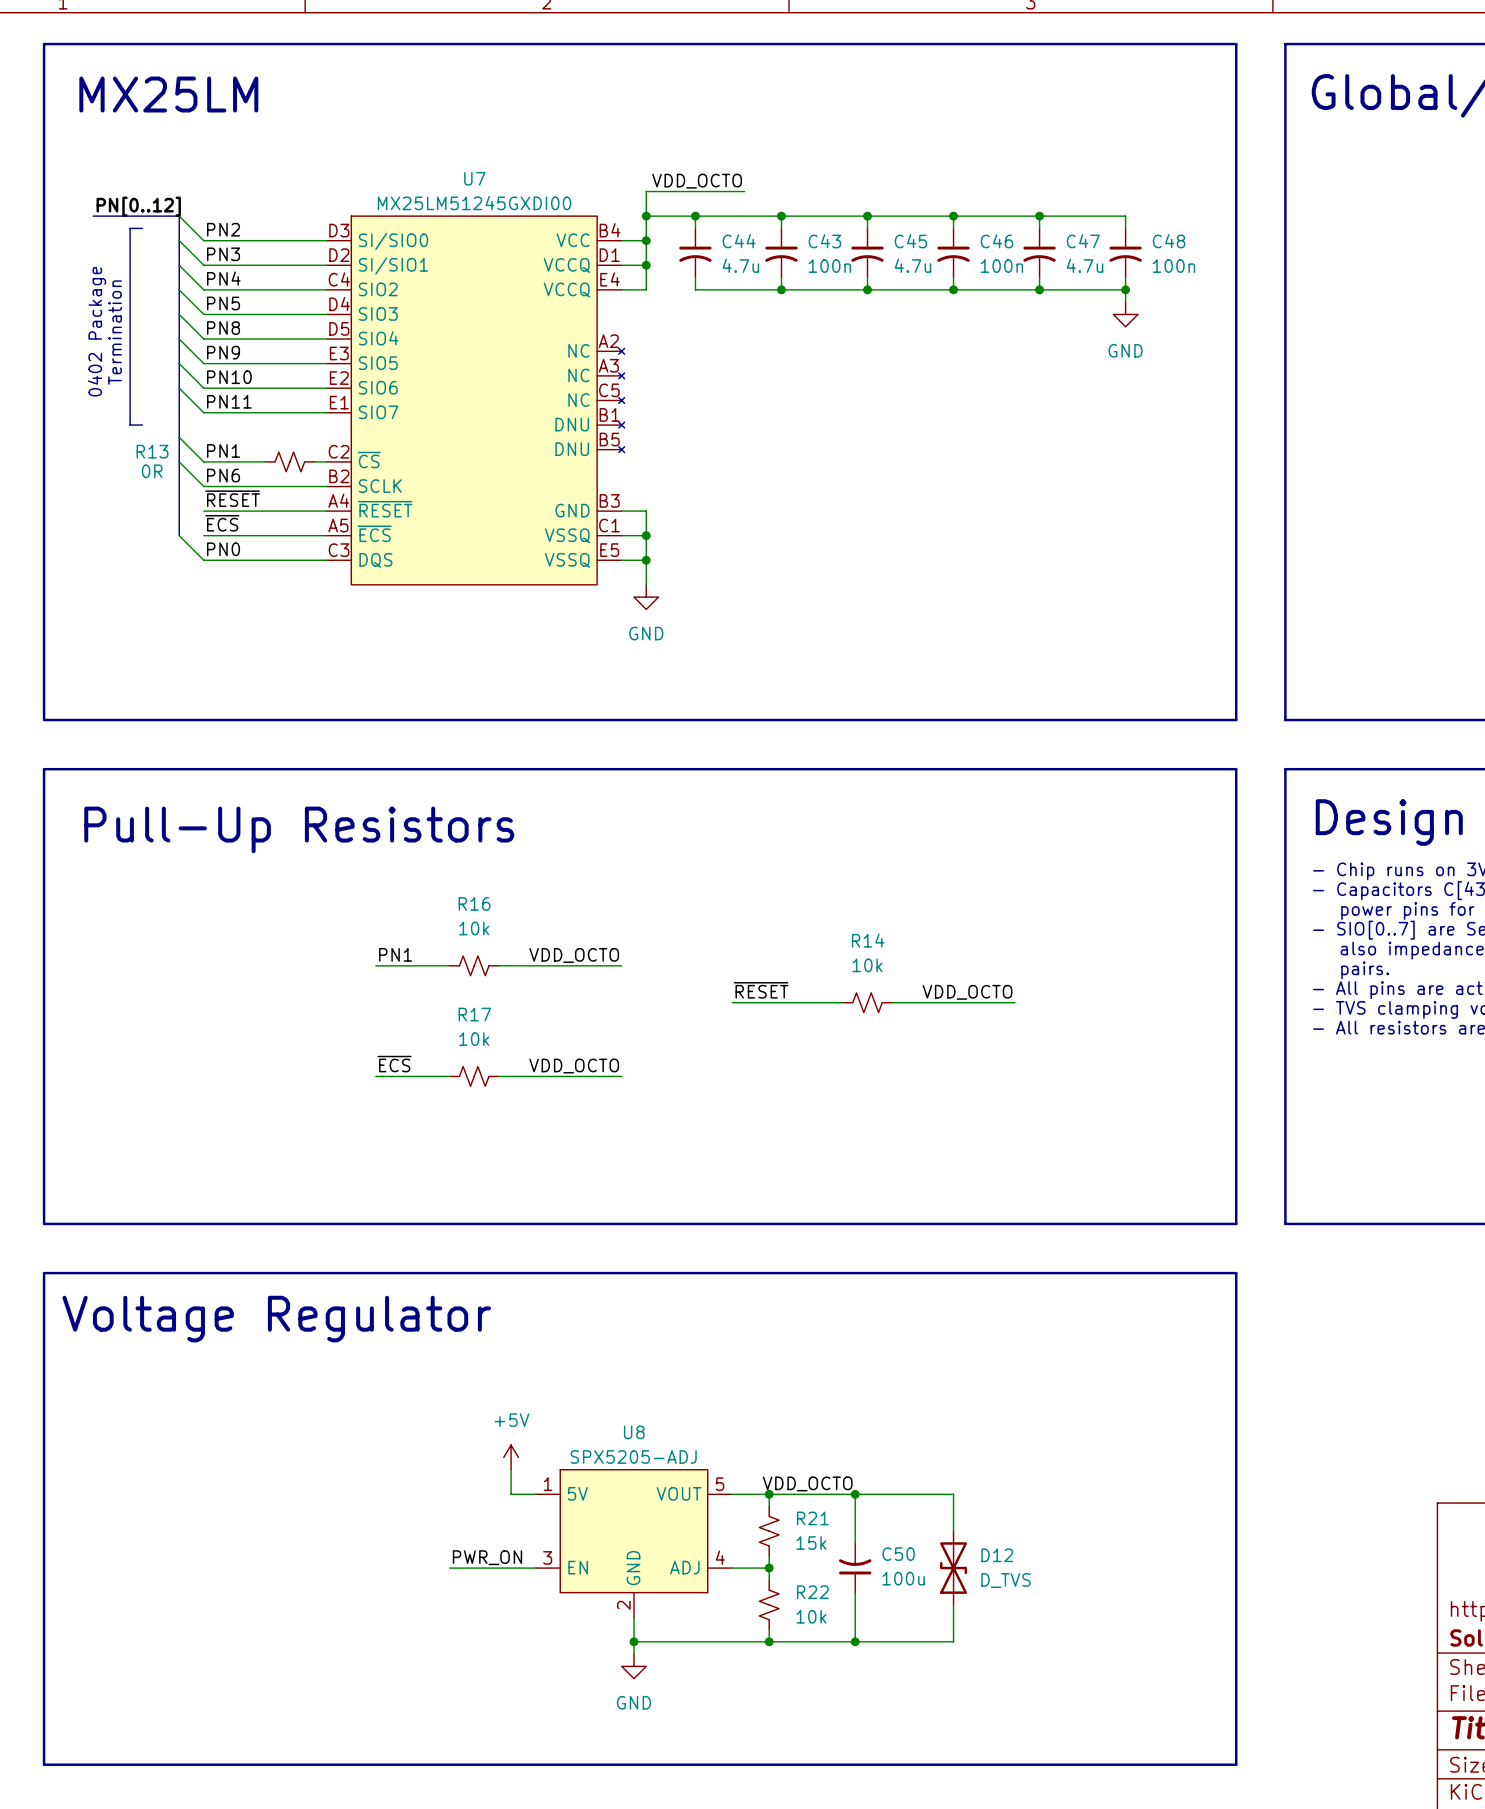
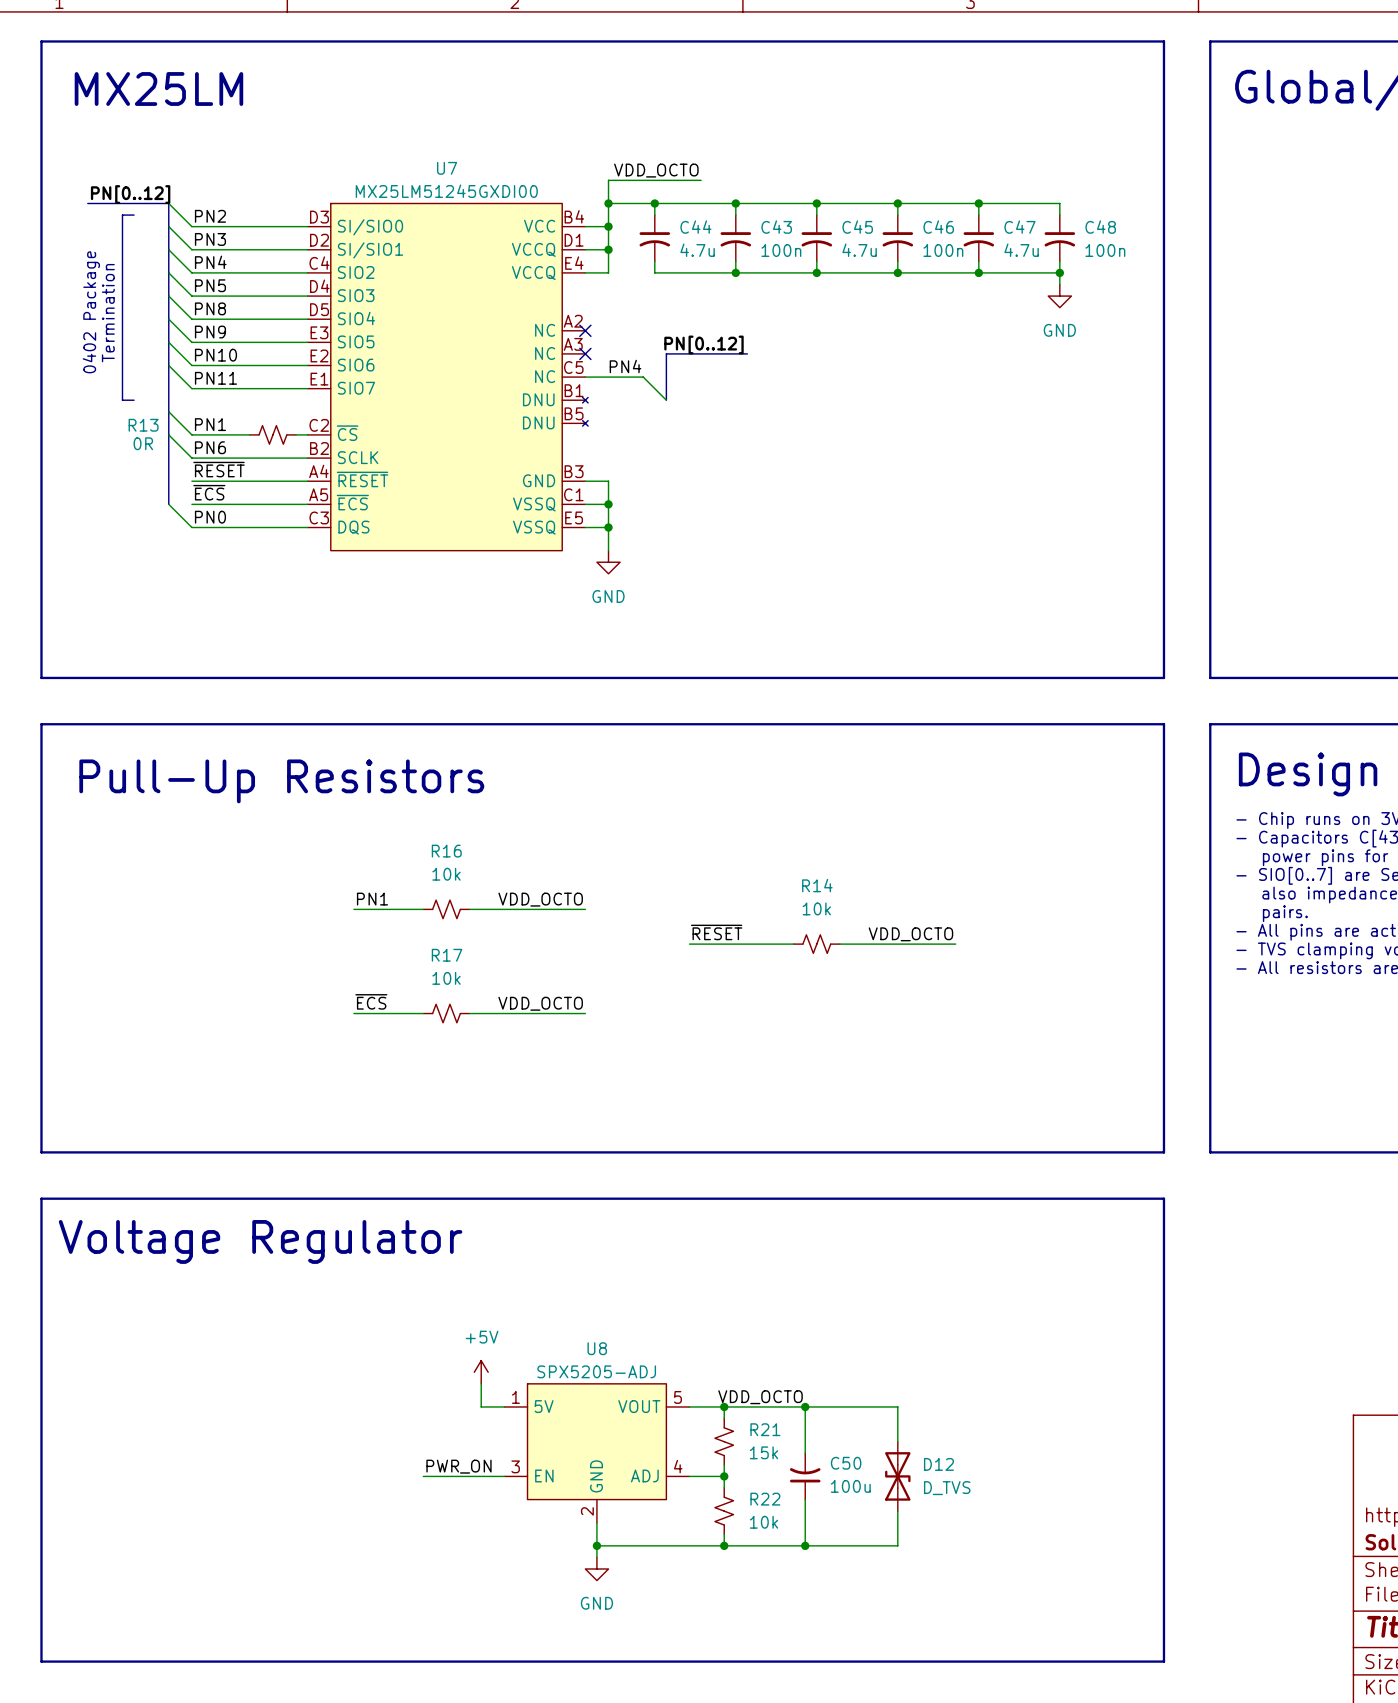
U7 symbol: [326, 216, 625, 585] -> [307, 203, 589, 551]
no-connect mark: none -> (585, 330)
label: none -> PN[0..12] (703, 344)
no-connect mark: none -> (585, 353)
bus: none -> (747, 353) (666, 353) (666, 400)
label: none -> PN4 (625, 366)
wire: none -> (585, 377) (643, 377) (666, 400)

